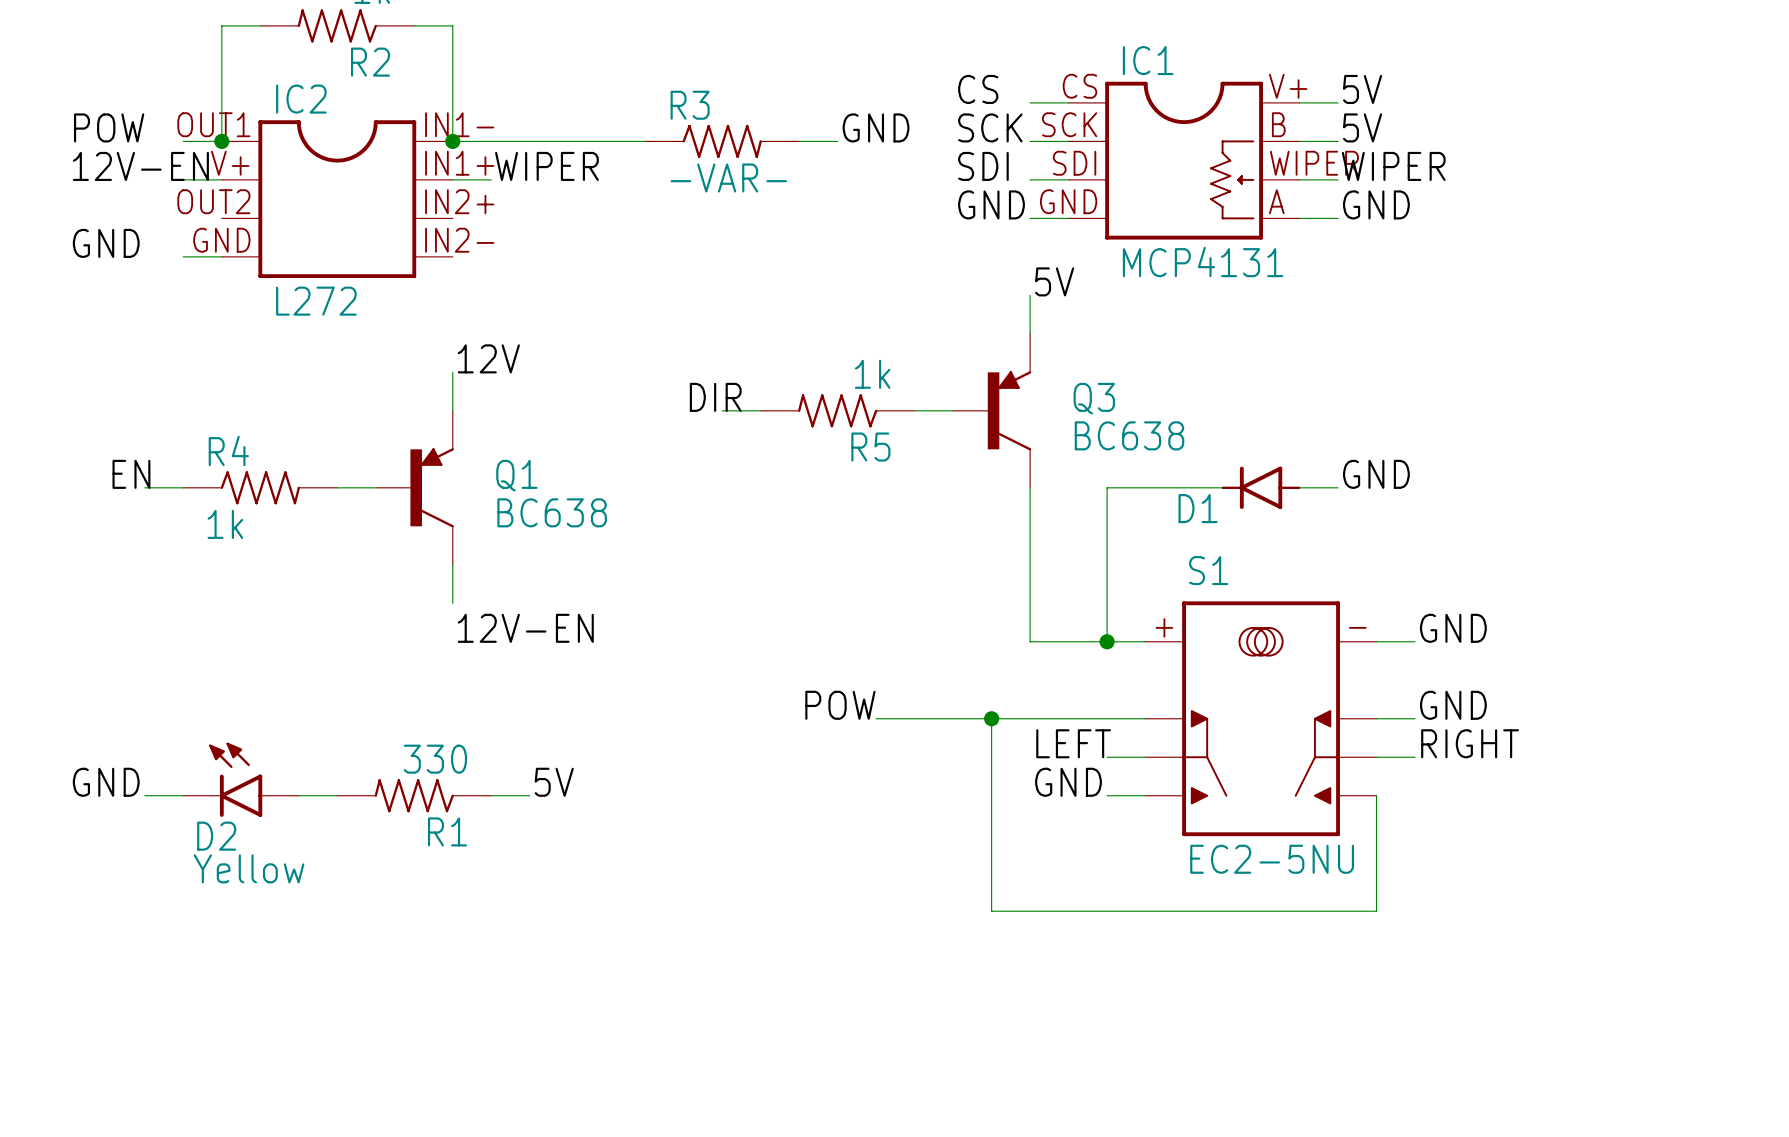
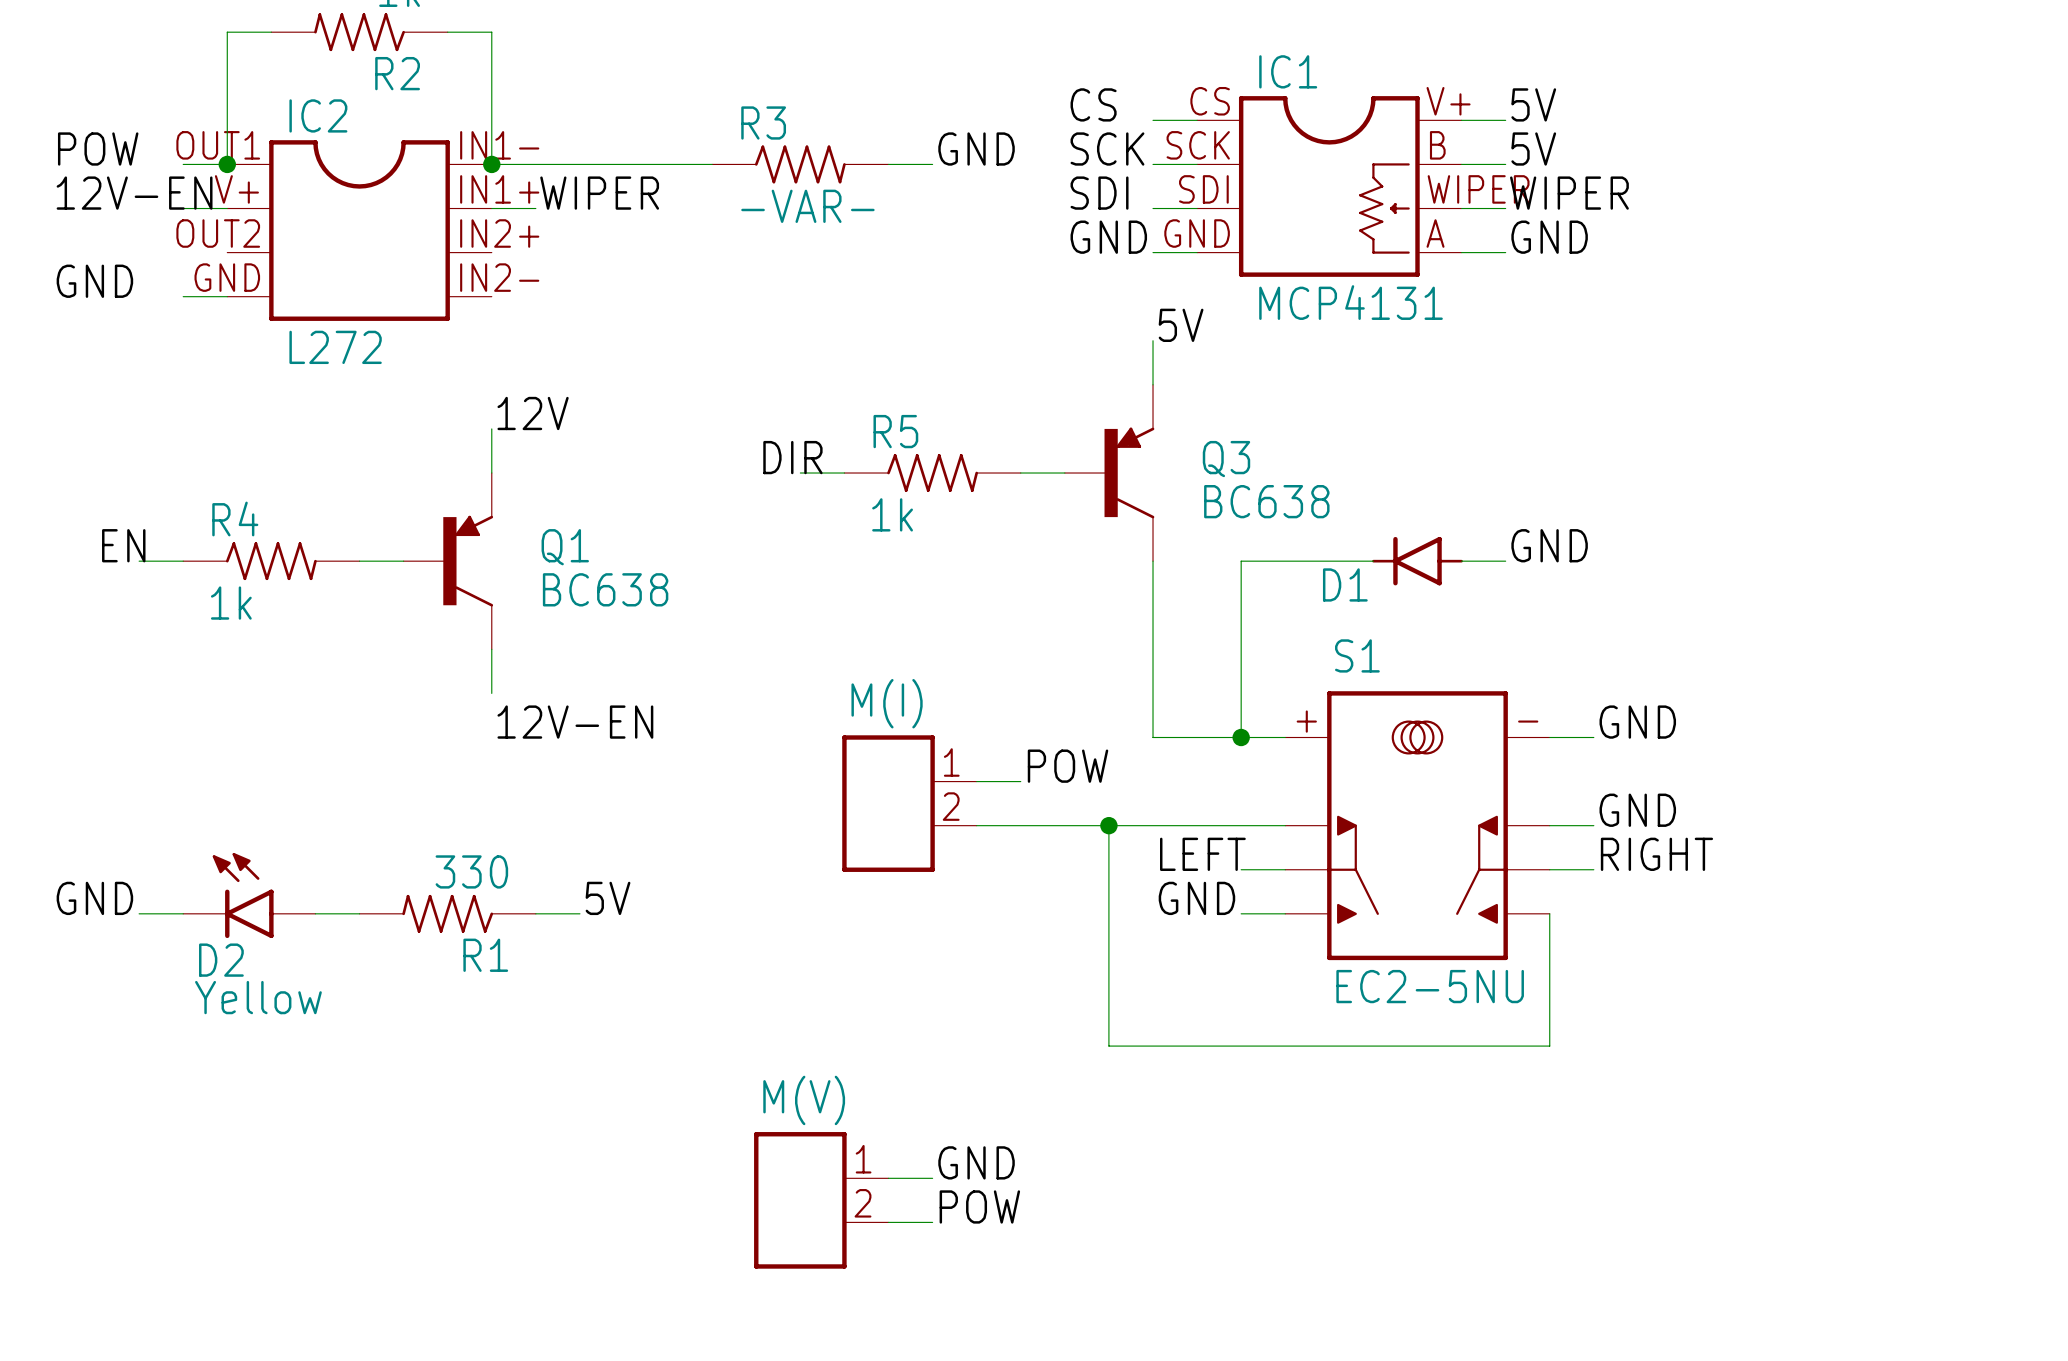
R5 rotation: 0° (837, 410) -> 180° (932, 473)
wire: none -> (976, 781) (1020, 781)
M(I): none -> (909, 803)
label position: POW (840, 705) -> POW (1068, 766)
label: none -> GND (976, 1162)
wire: none -> (888, 1178) (932, 1178)
M(V): none -> (821, 1200)
label: none -> POW (979, 1206)
wire: none -> (888, 1222) (932, 1222)

